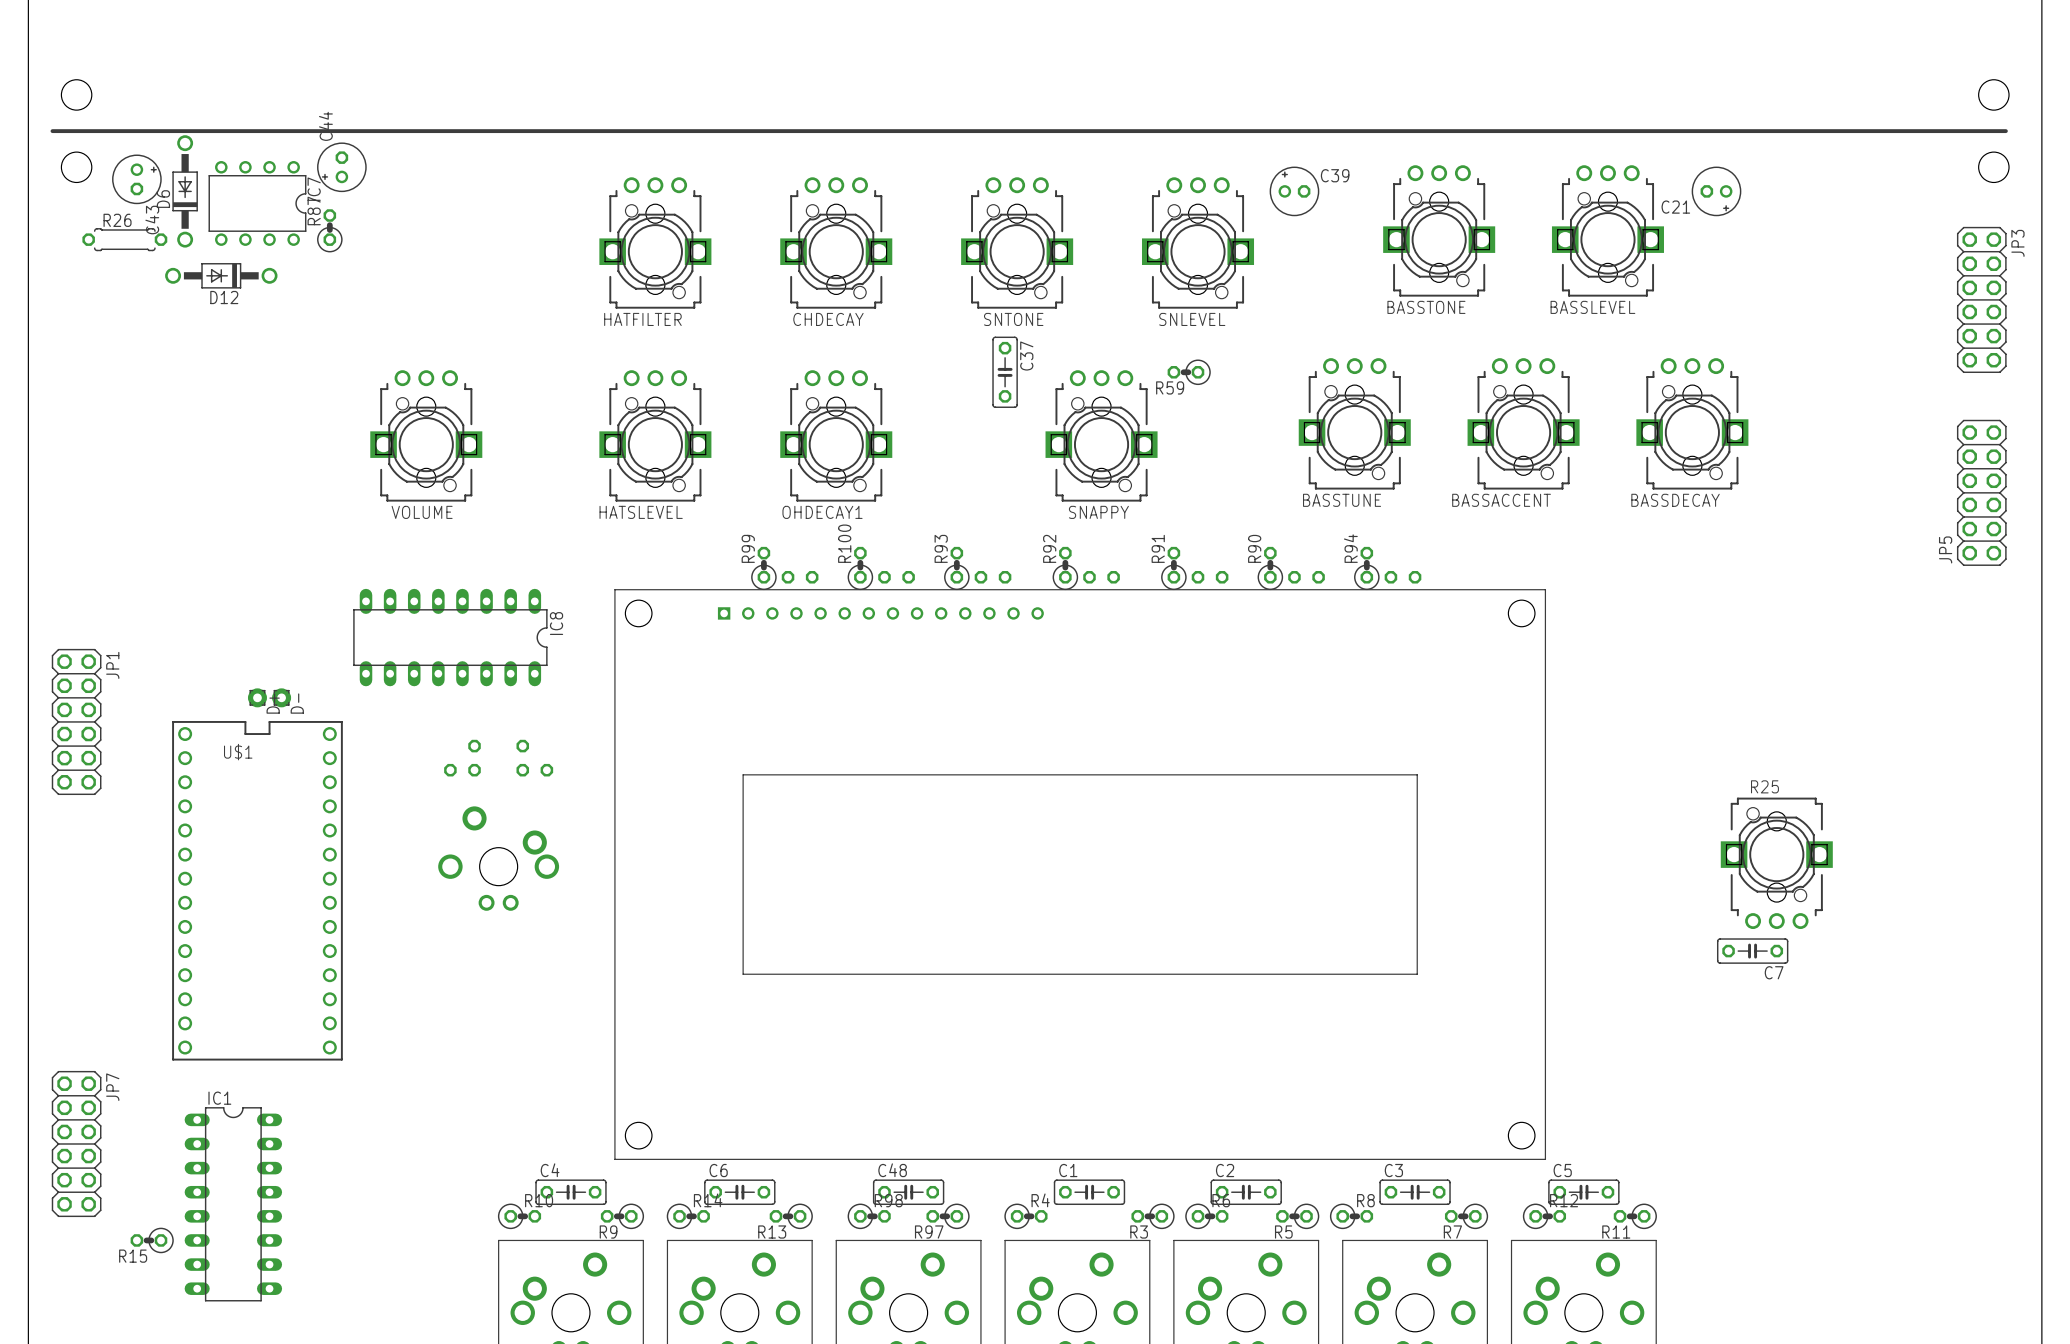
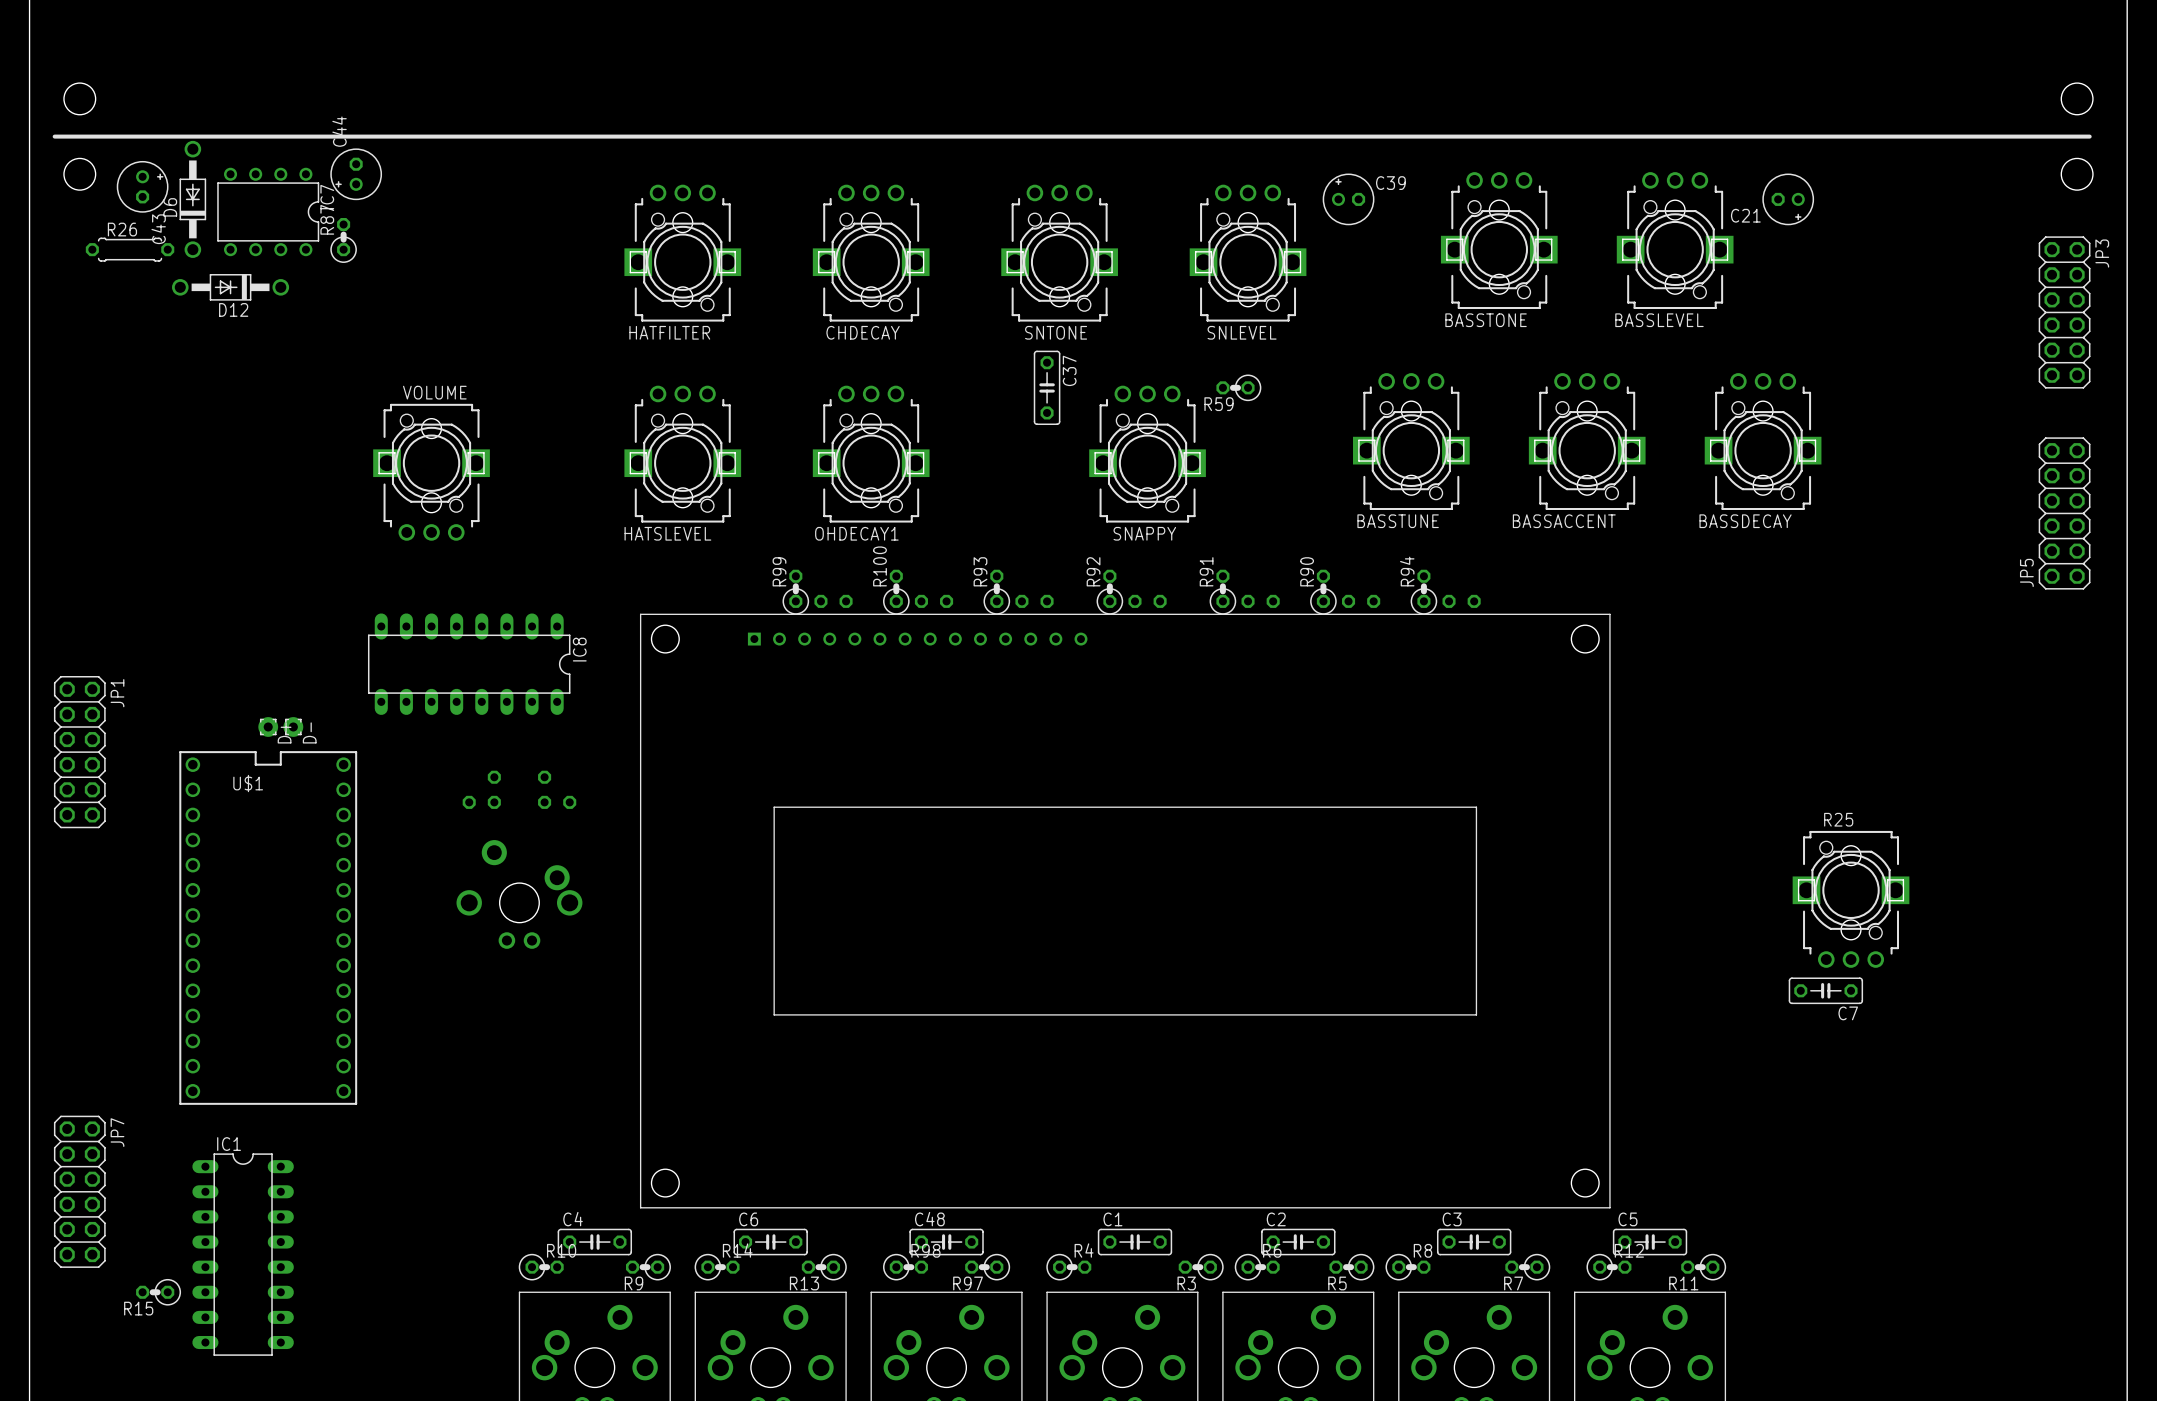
VOLUME rotation: 0° (426, 435) -> 180° (431, 472)

